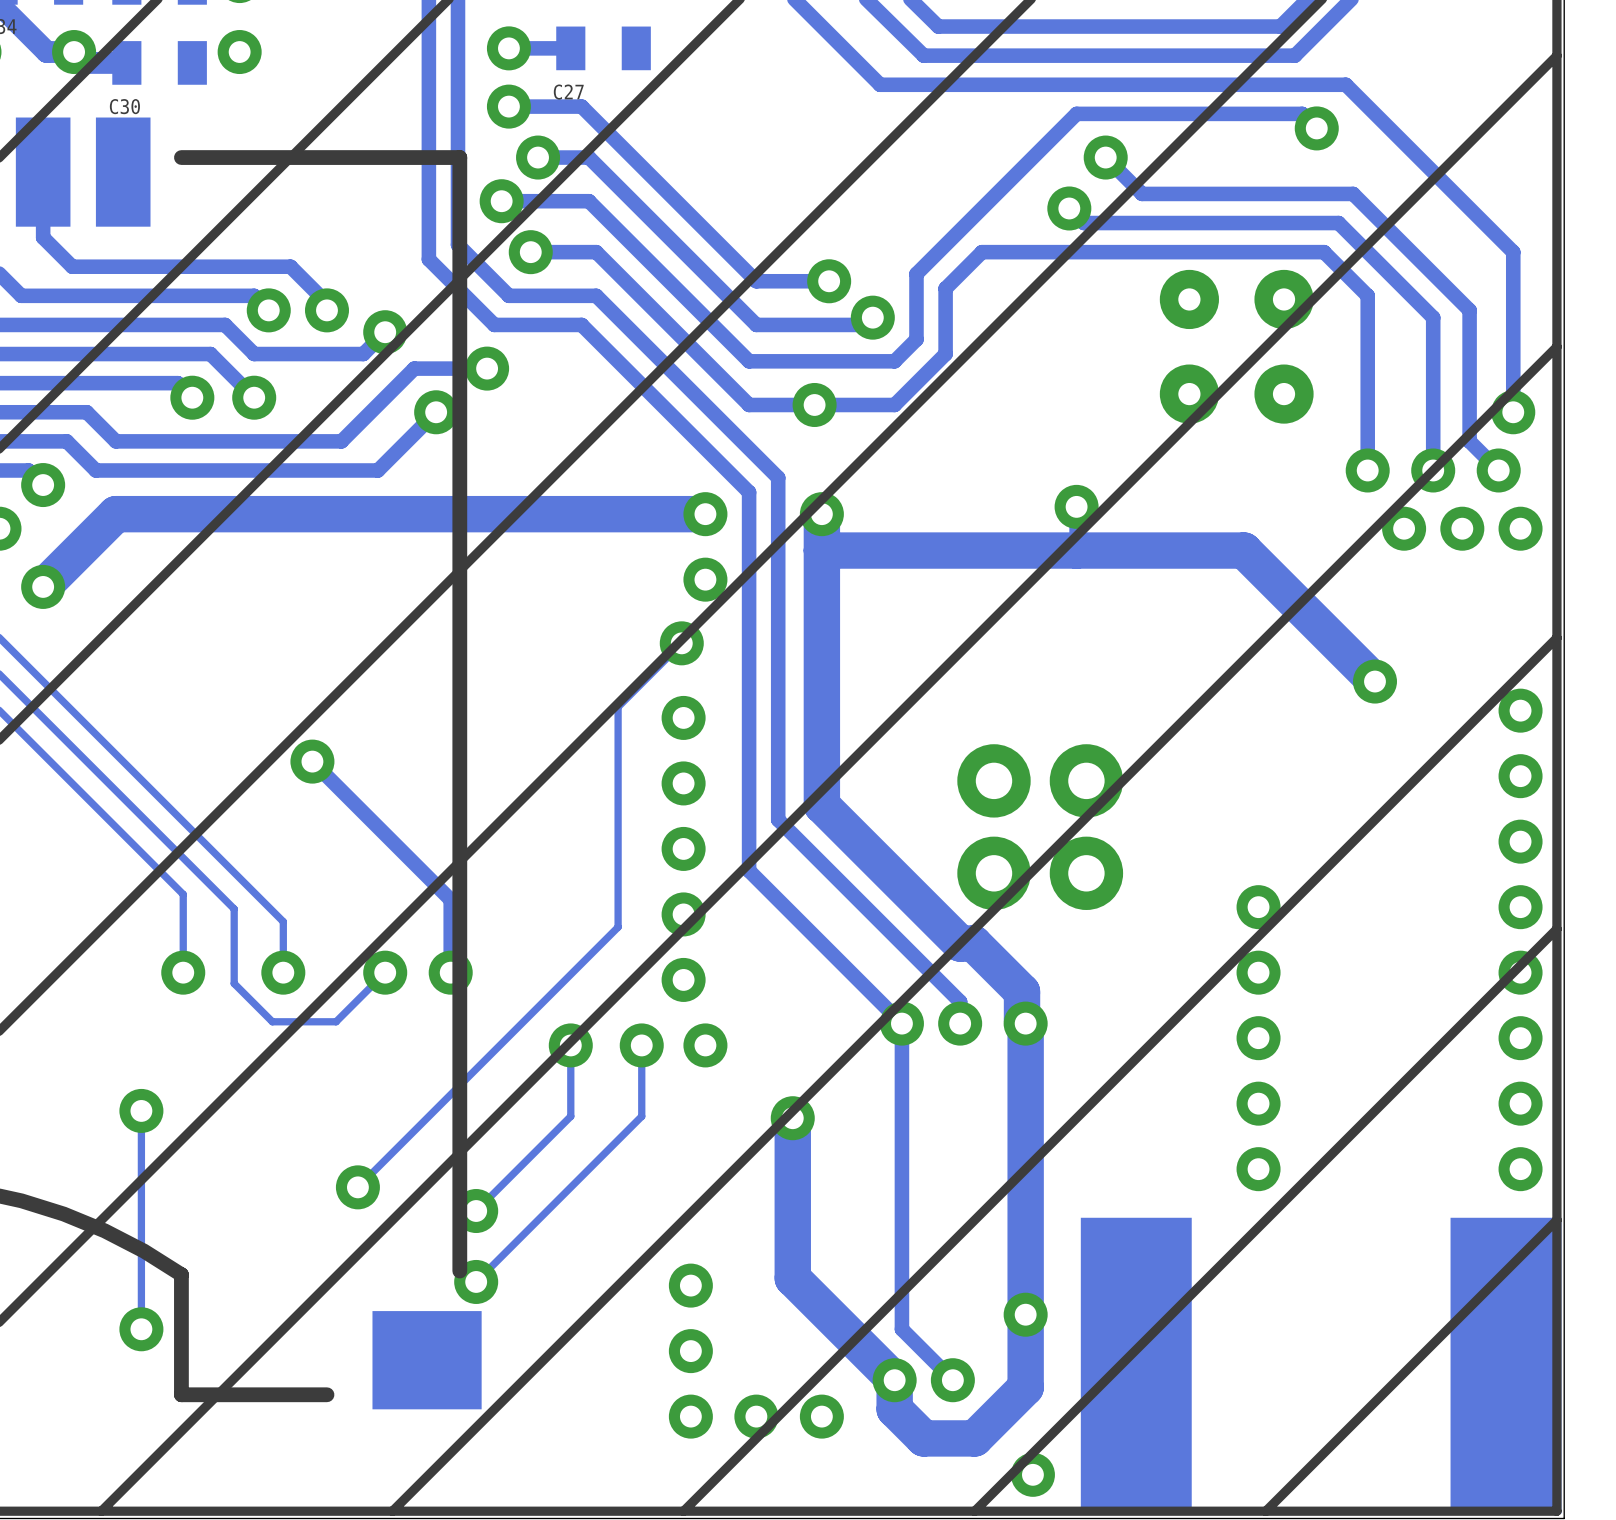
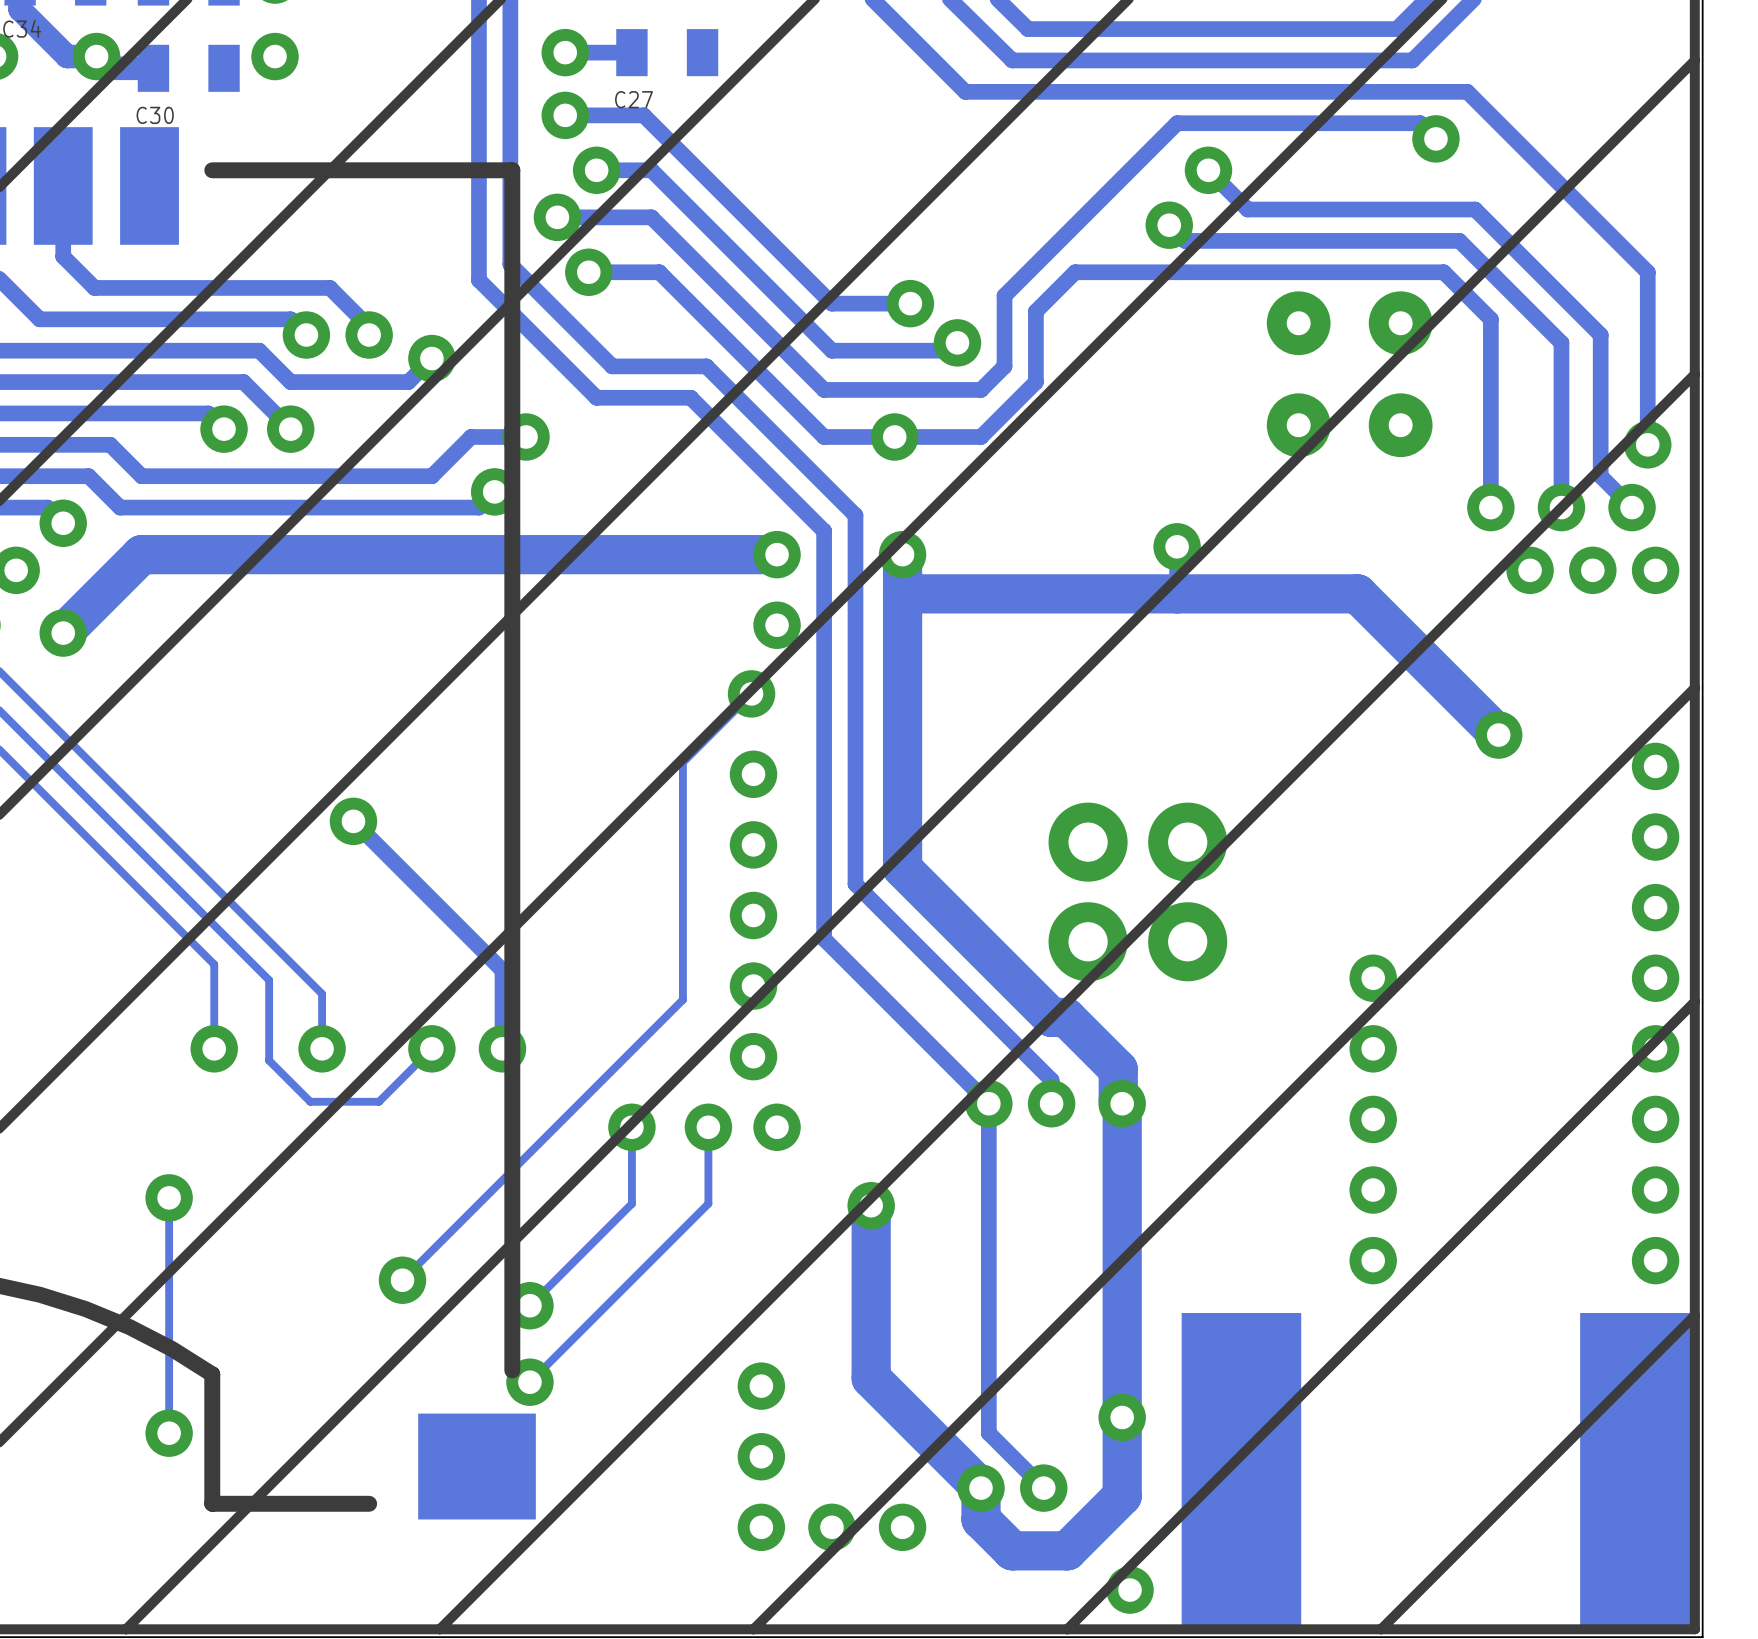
track: (508, 295) (596, 295) (639, 339) -> (565, 319) (612, 366) (706, 366)
track: (494, 324) (581, 324) (625, 368) -> (549, 350) (596, 397) (690, 397)
track: (487, 368) (414, 368) (341, 441) -> (526, 436) (471, 436) (431, 476) (384, 476)
via: (487, 368) -> none
via: none -> (526, 436)
track: (436, 412) (377, 470) -> (494, 491) (478, 507) (424, 507)
via: (436, 412) -> none
via: none -> (494, 491)

